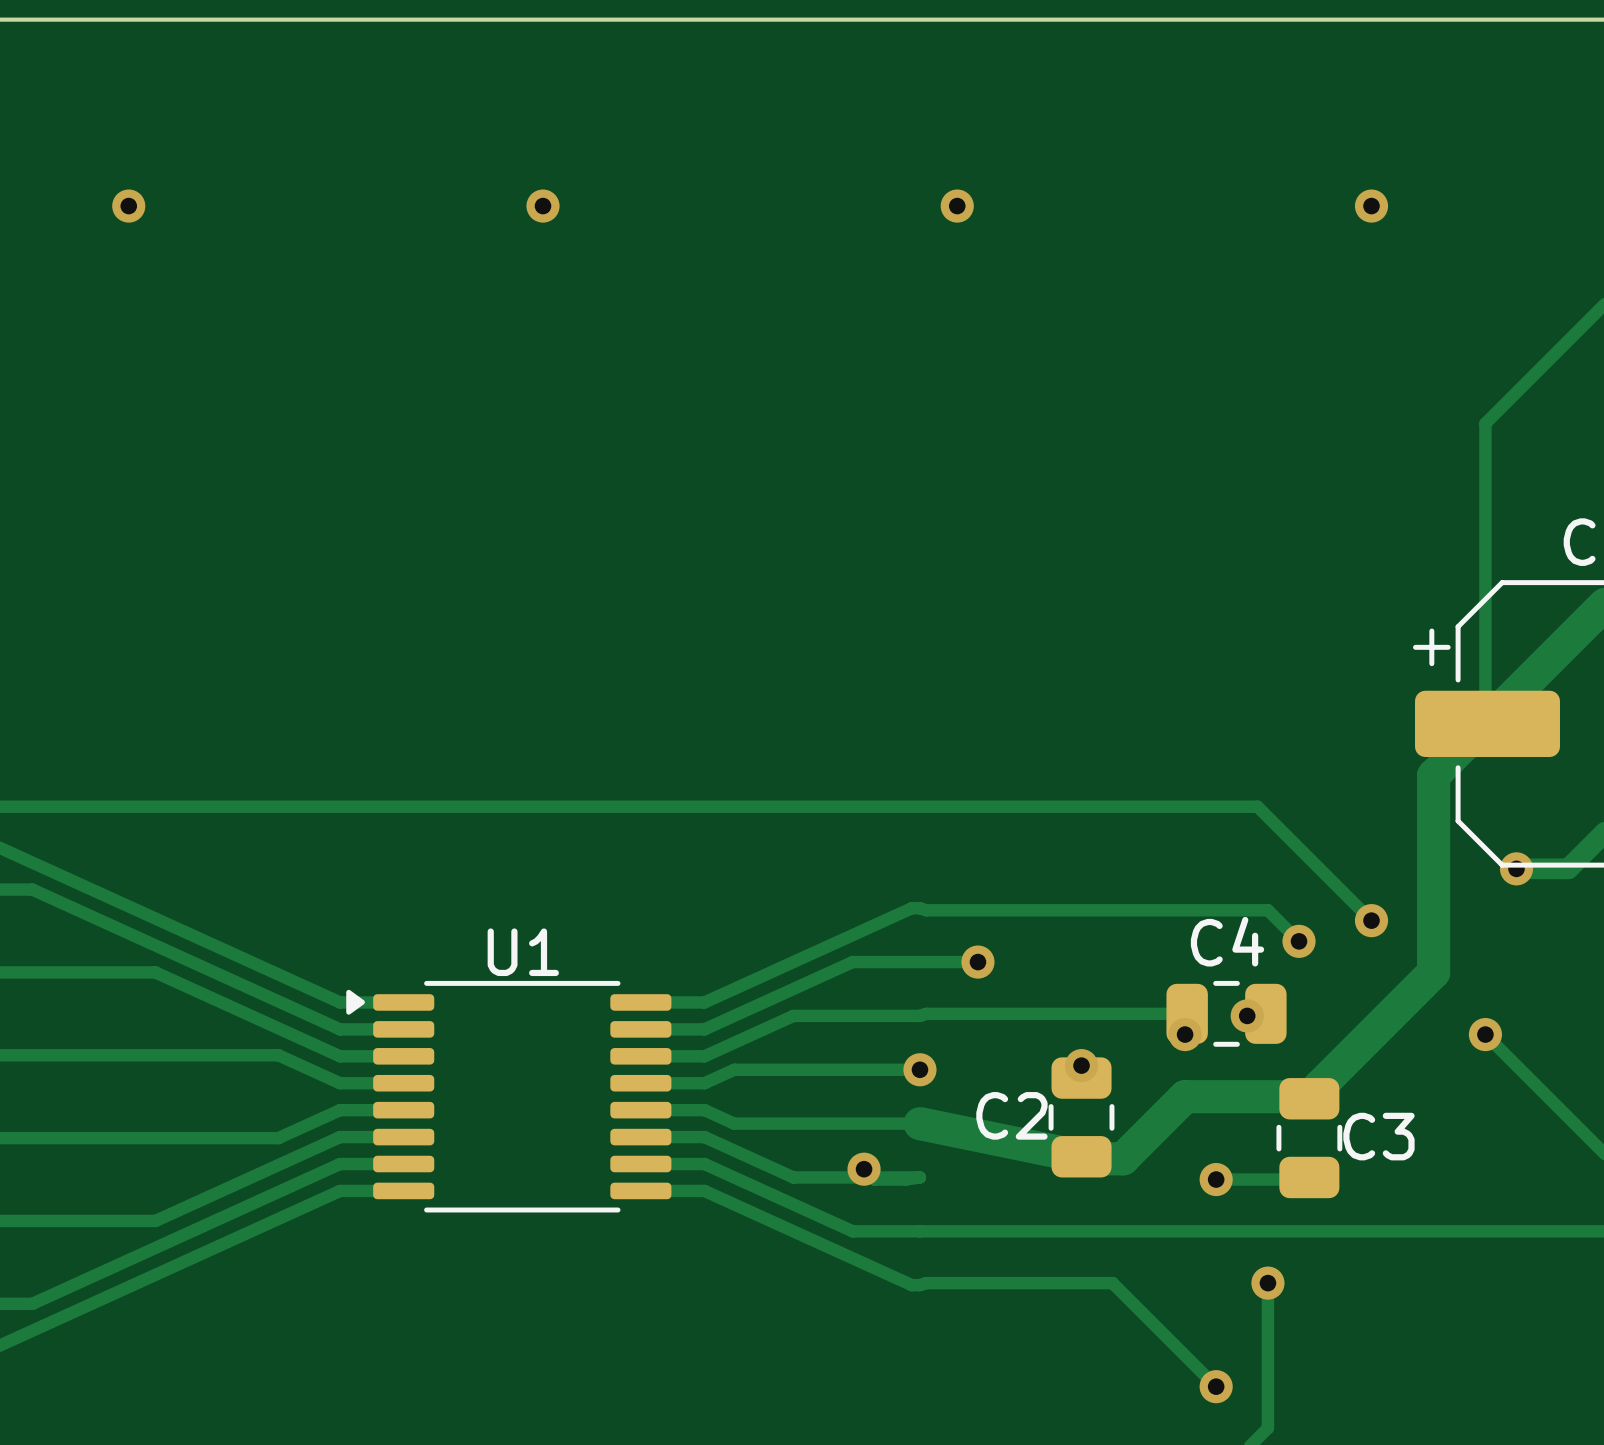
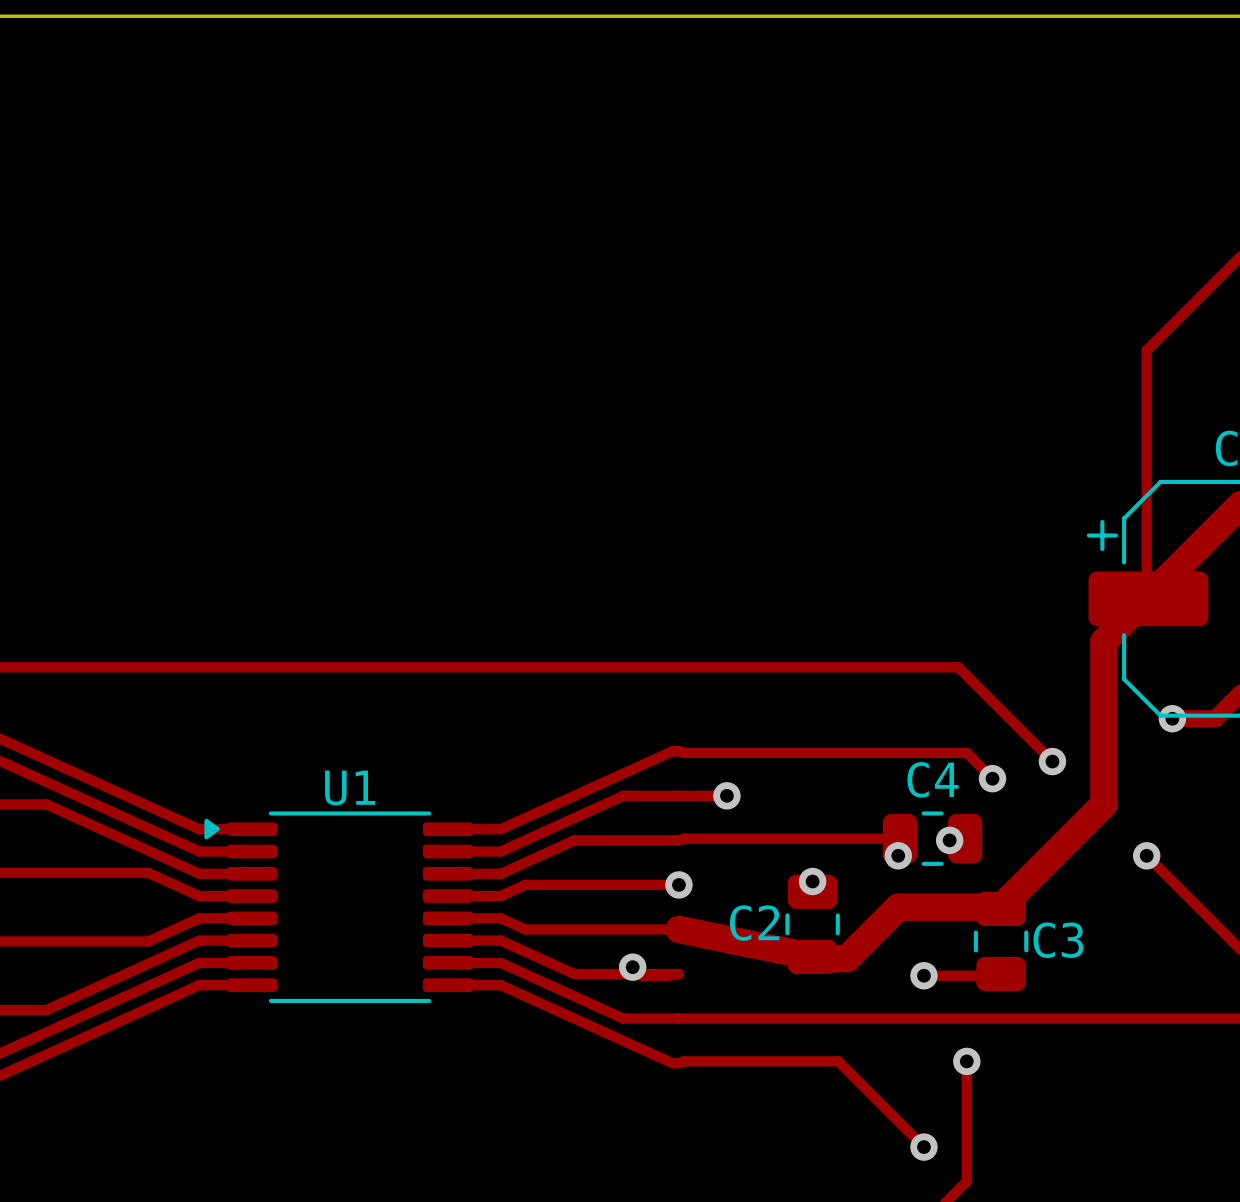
via: (128, 206) -> none
via: (543, 206) -> none
via: (957, 206) -> none
via: (1371, 206) -> none

